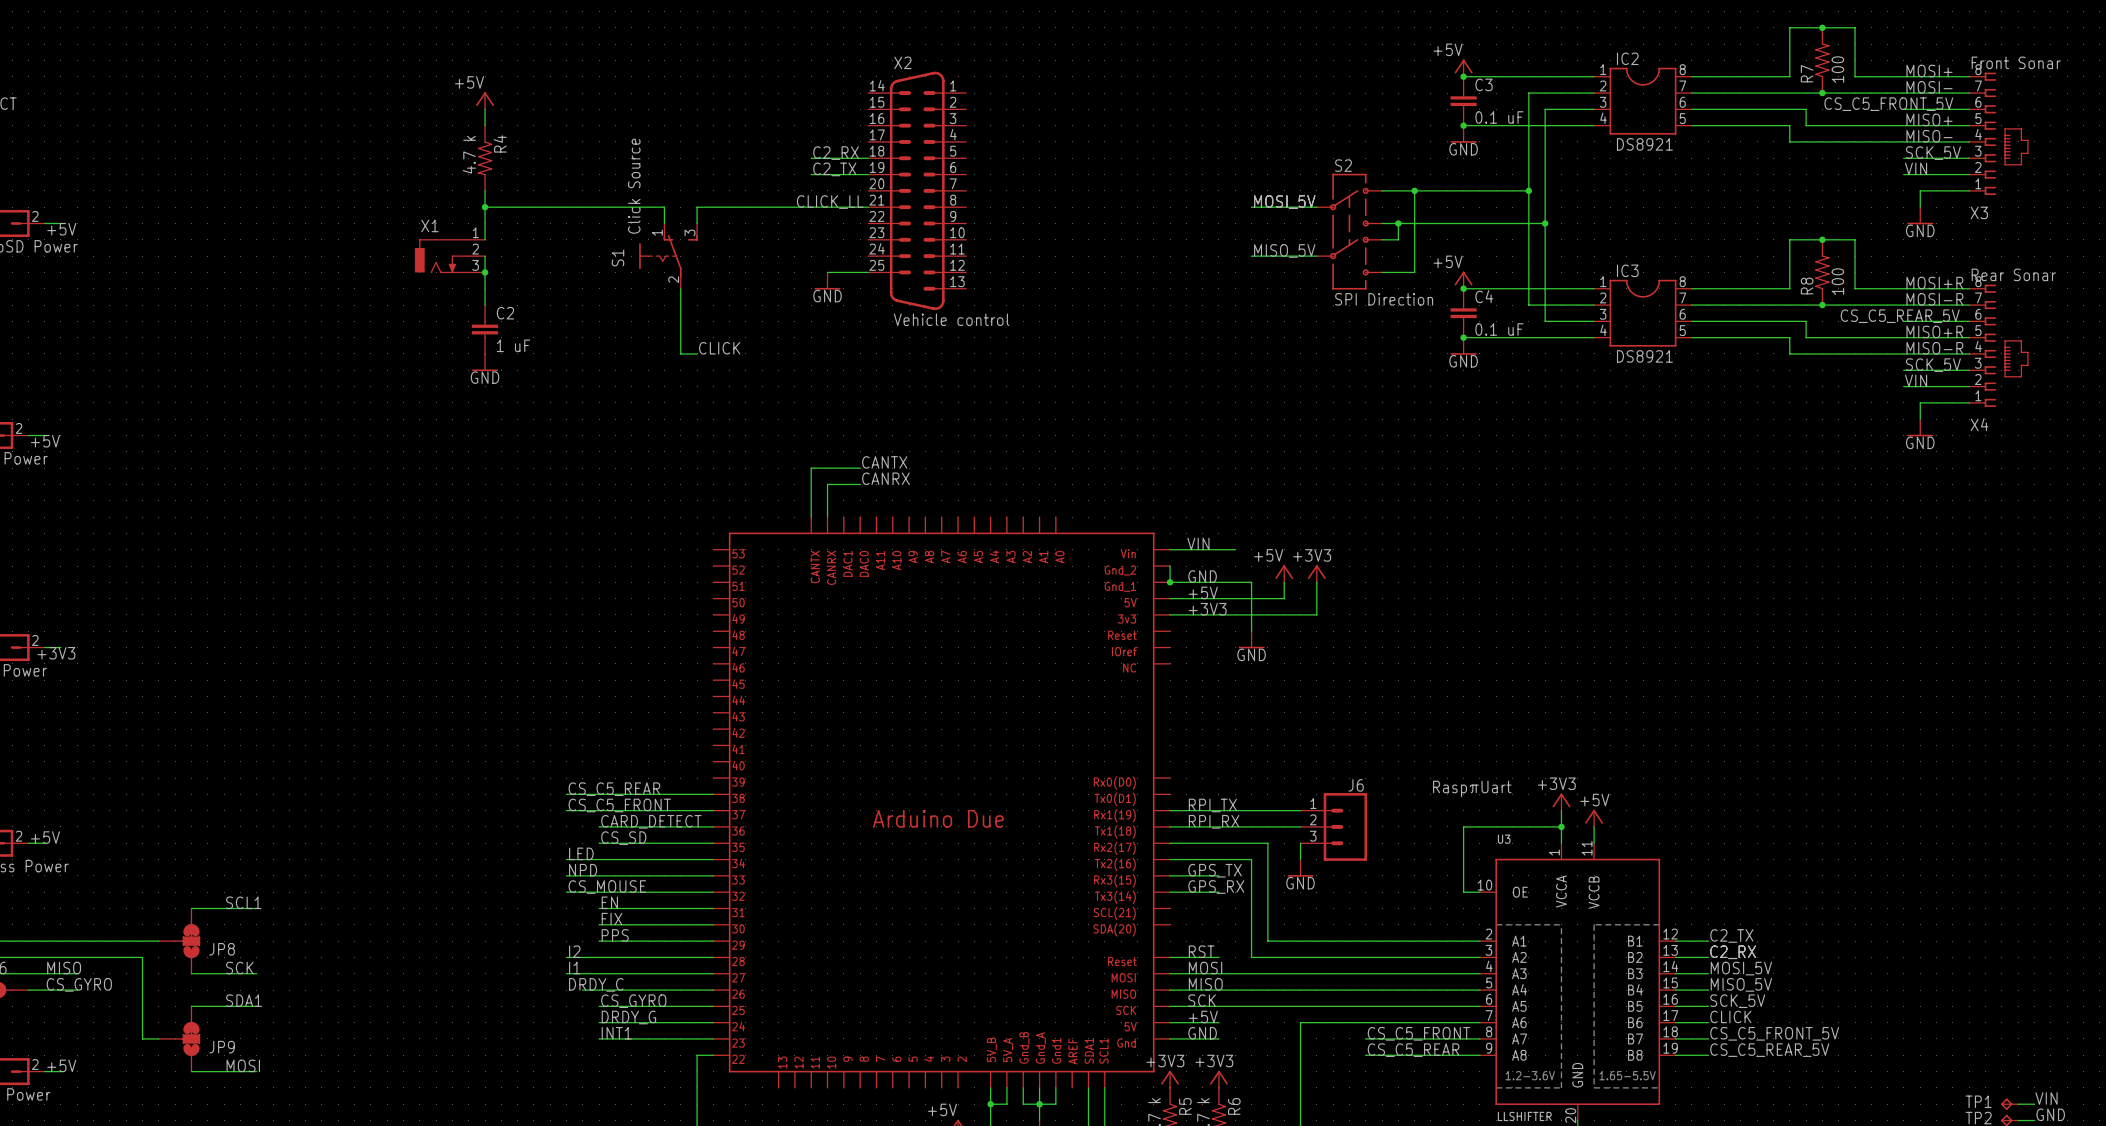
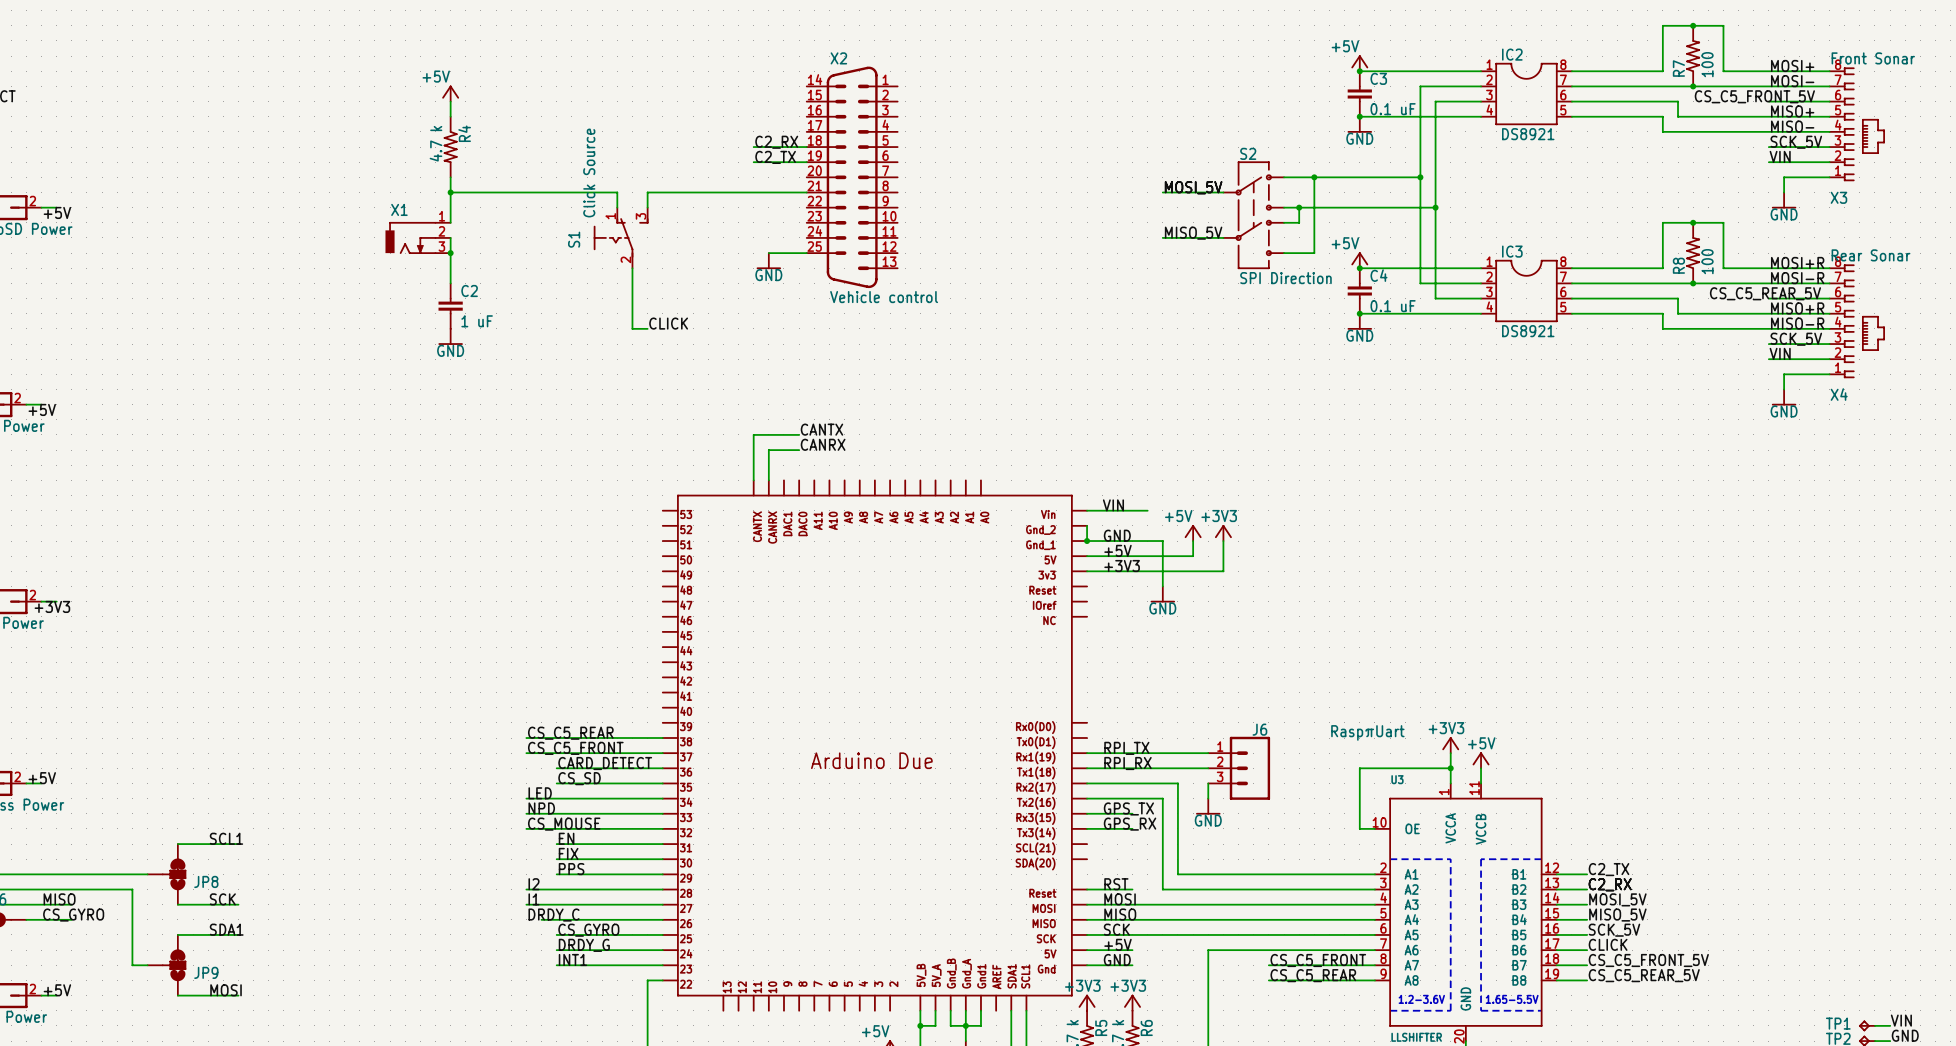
label: CLICK_LL (830, 202) -> none

